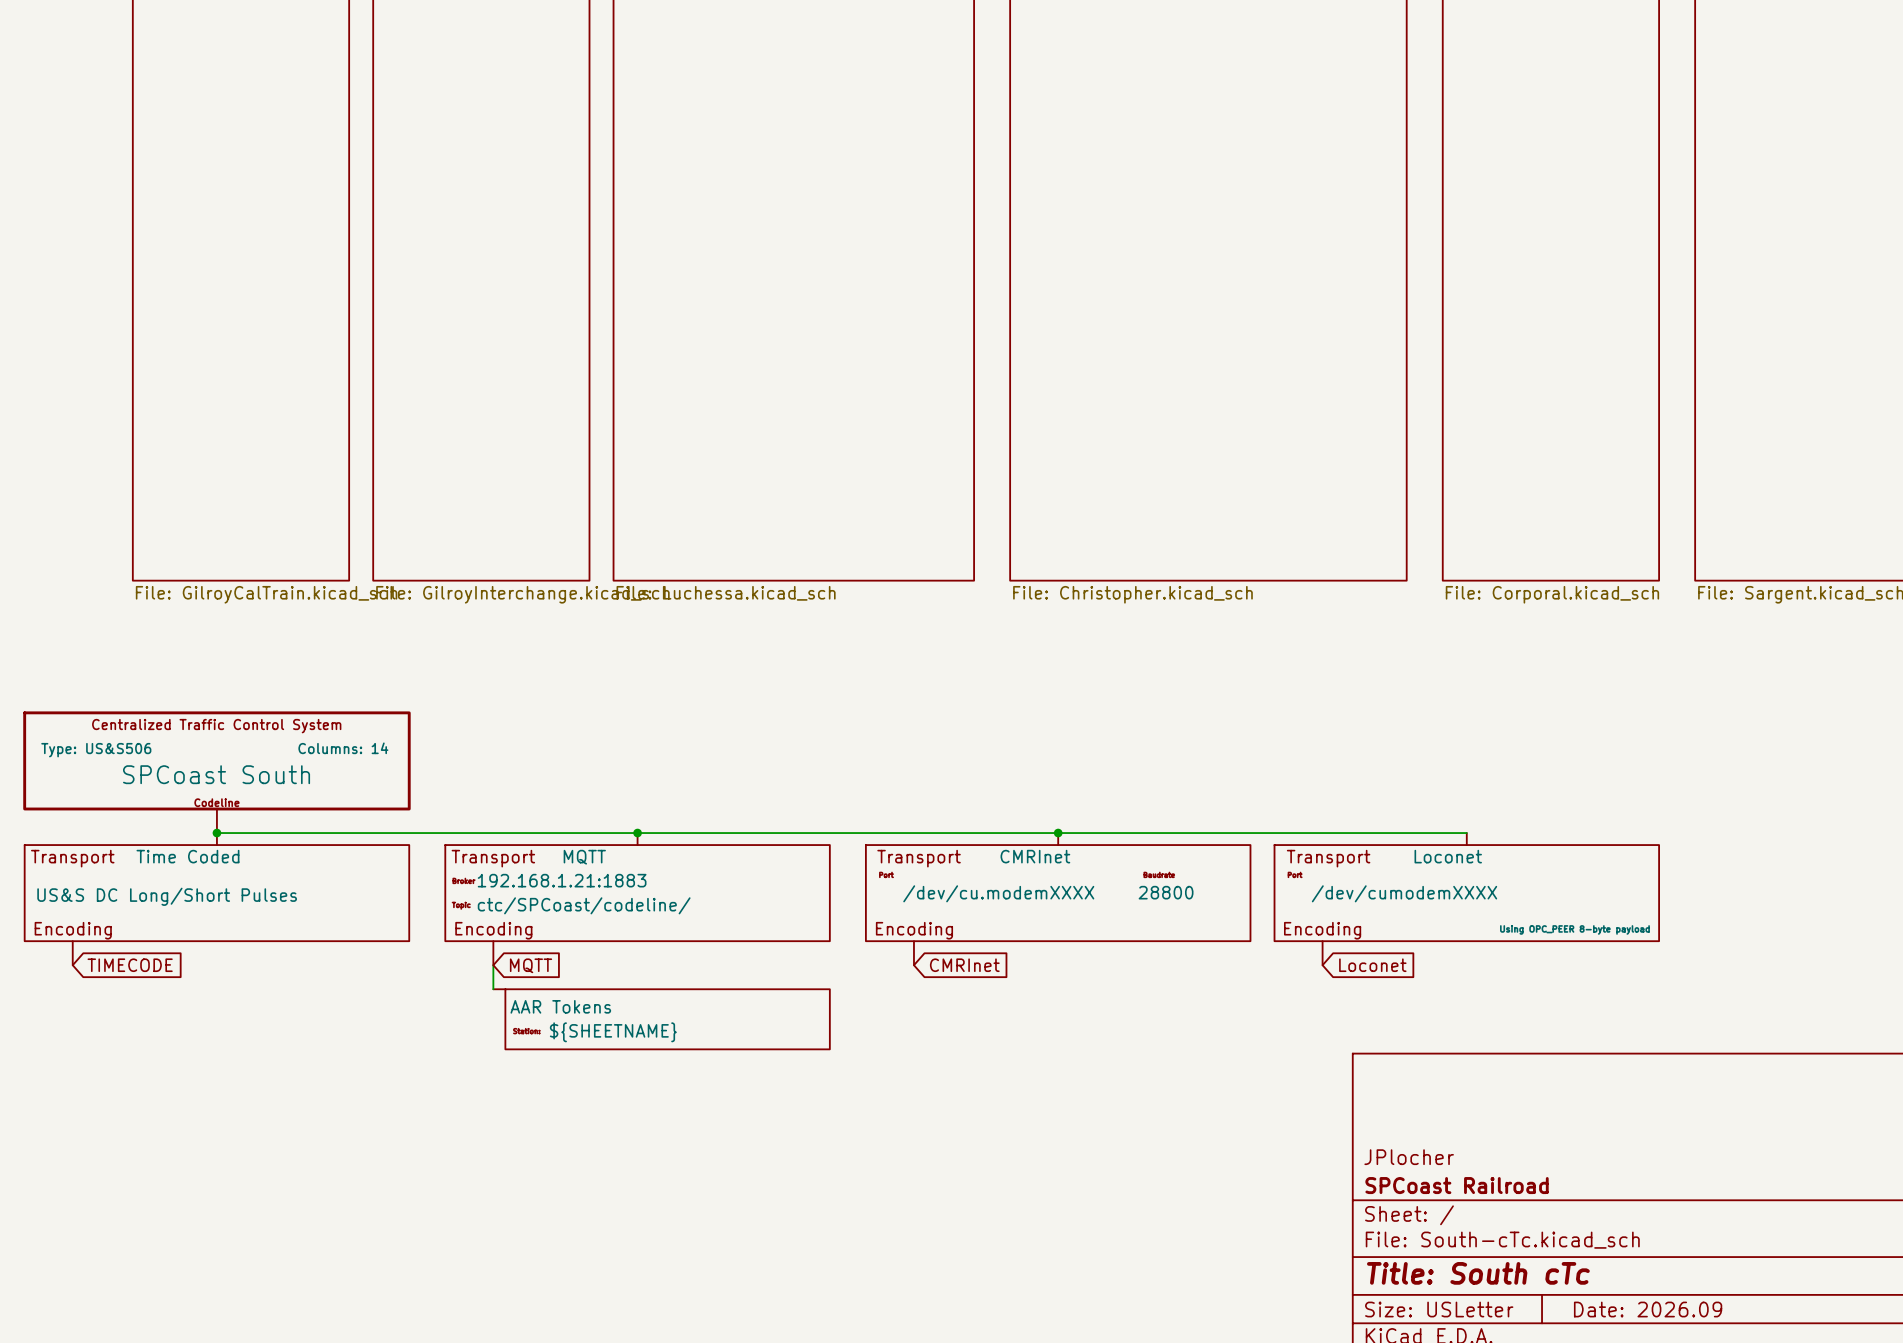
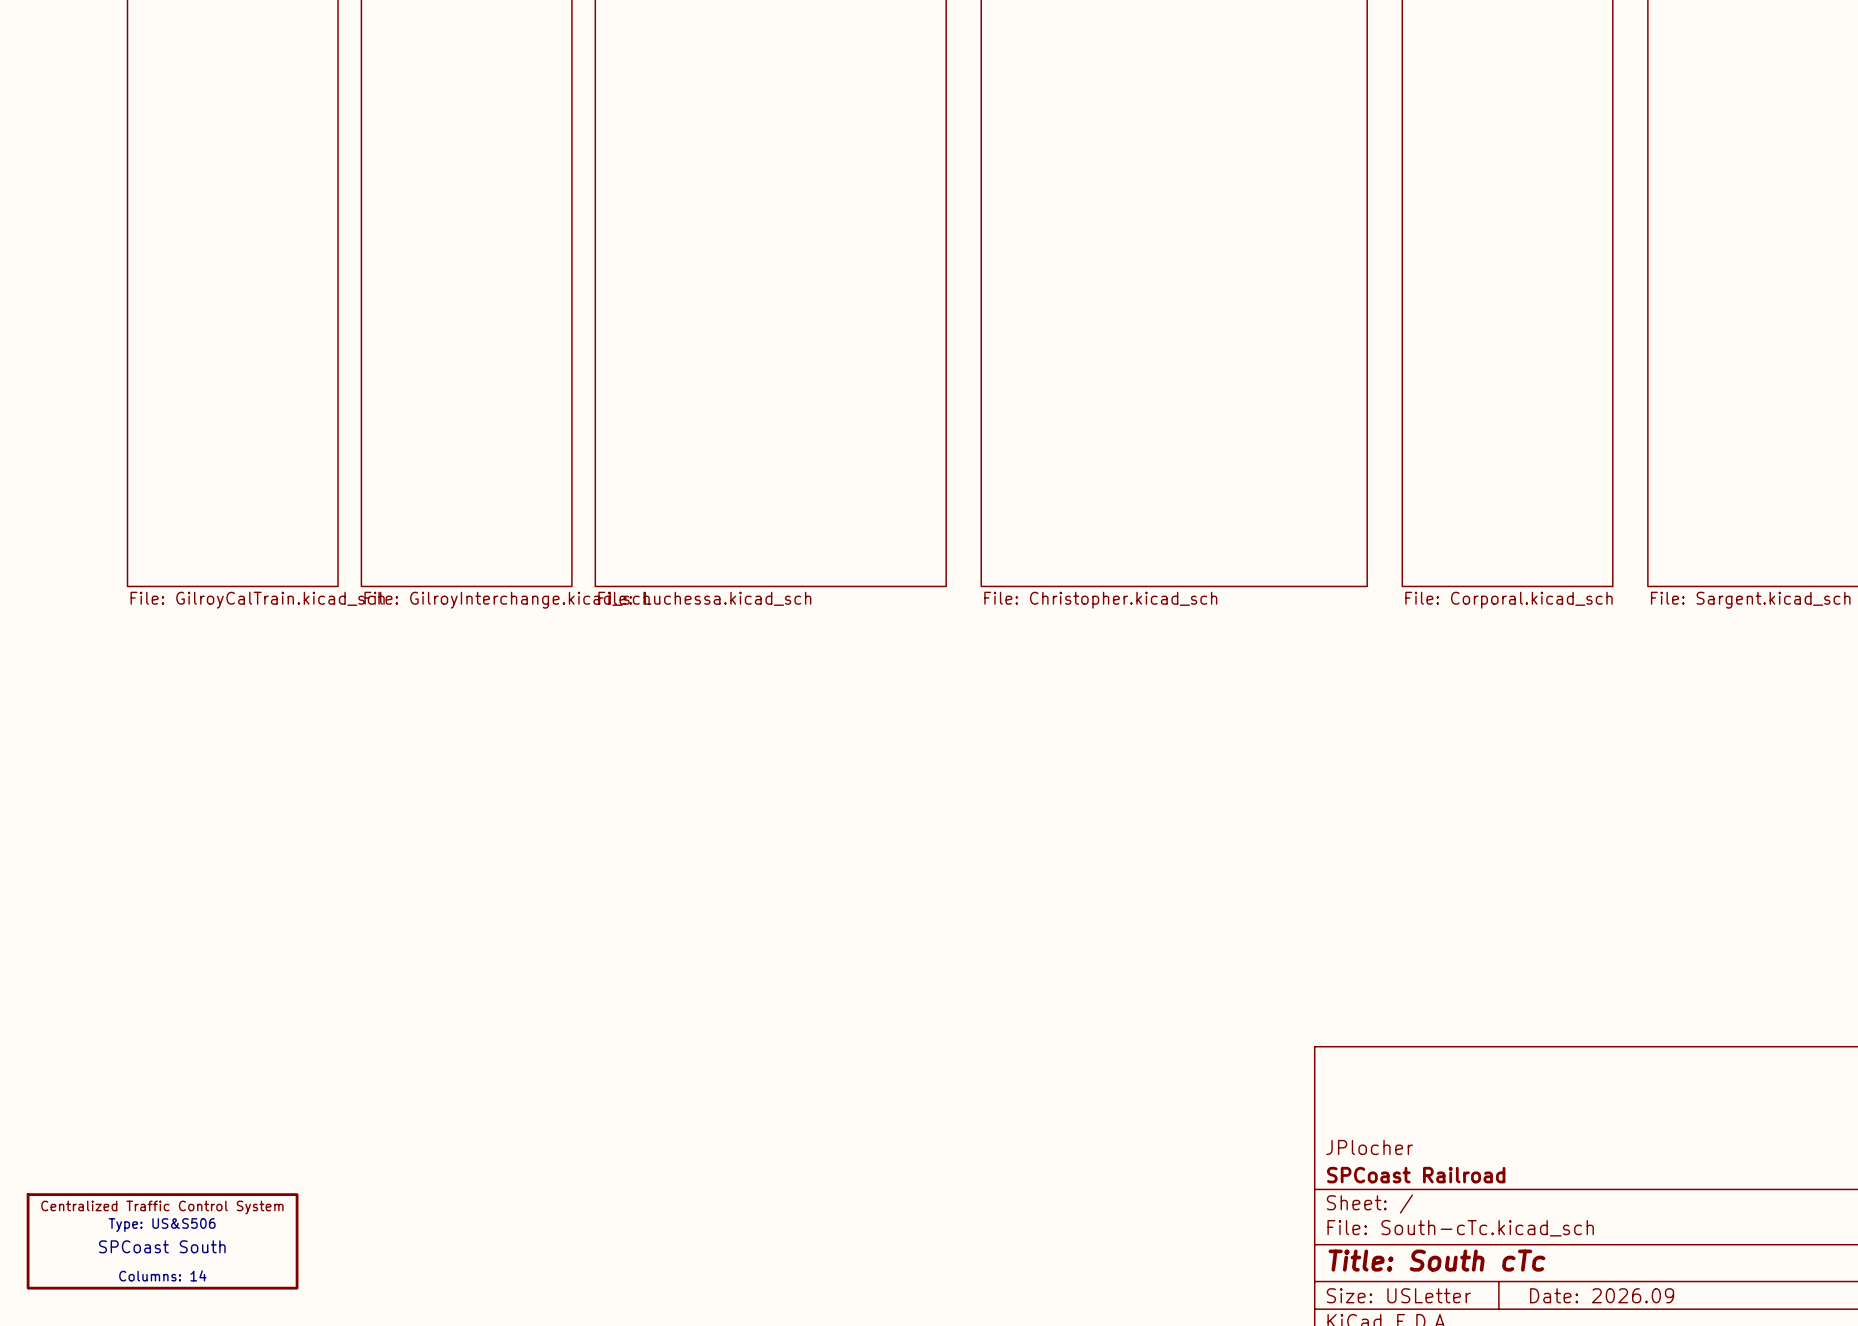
part: SPCoast South (216, 772) -> none
wire: (216, 833) (1466, 833) -> none
junction: (216, 833) -> none
junction: (637, 833) -> none
junction: (1058, 833) -> none
part: Time Coded (216, 899) -> none
part: MQTT (637, 899) -> none
part: CMRInet (1058, 899) -> none
part: Loconet (1466, 899) -> none
global label: TIMECODE (130, 965) -> none
wire: (493, 965) (493, 989) -> none
global label: MQTT (531, 965) -> none
global label: CMRInet (964, 965) -> none
global label: Loconet (1372, 965) -> none
part: AAR Tokens (661, 1019) -> none
part: none -> SPCoast South (162, 1241)

